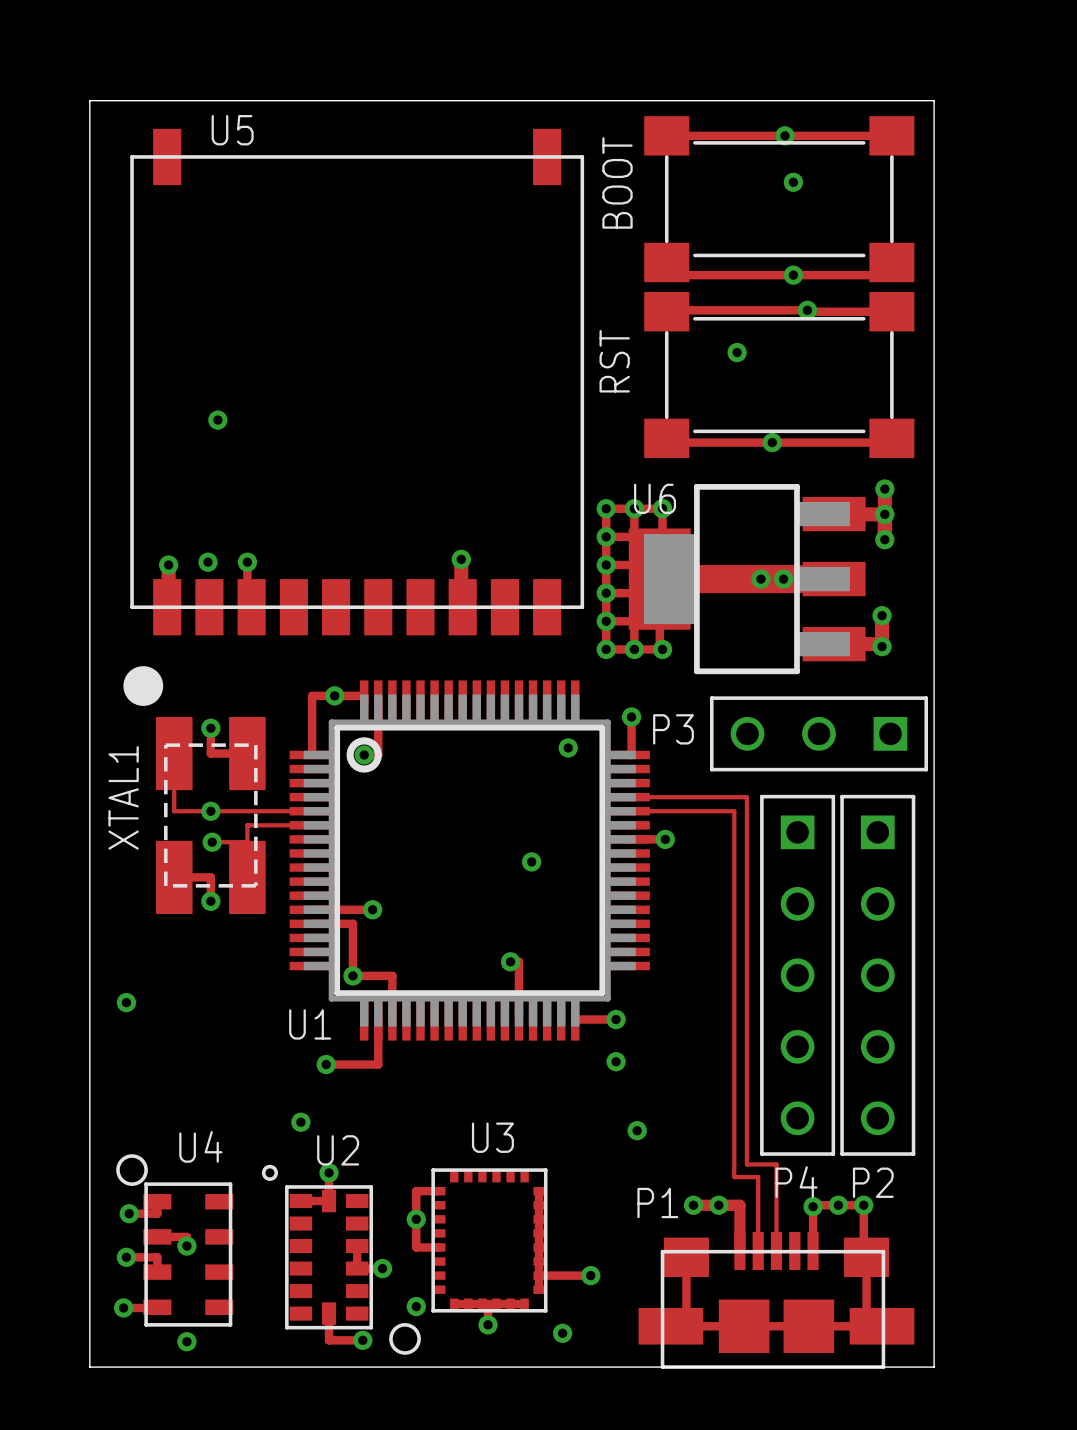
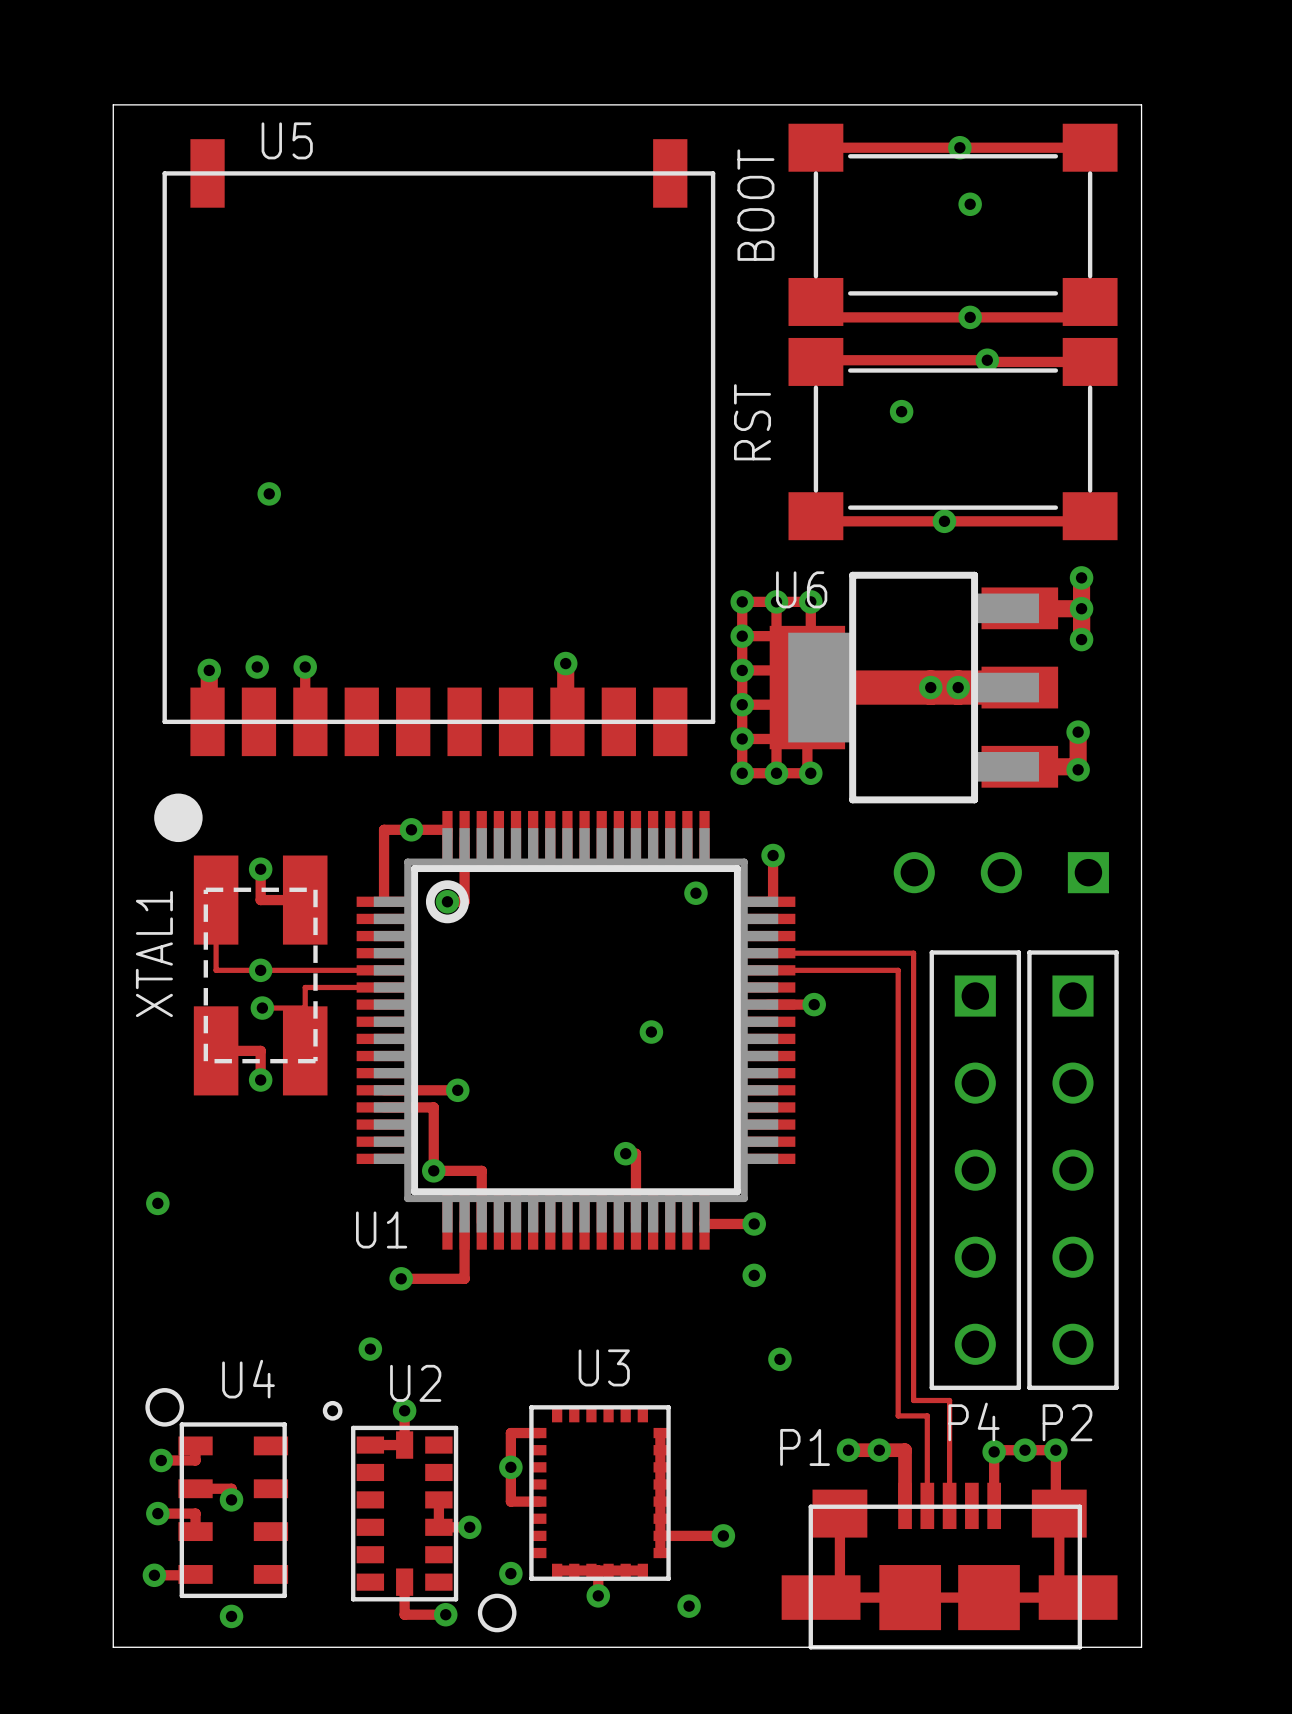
P3 side: top (818, 733) -> bottom (1001, 872)

